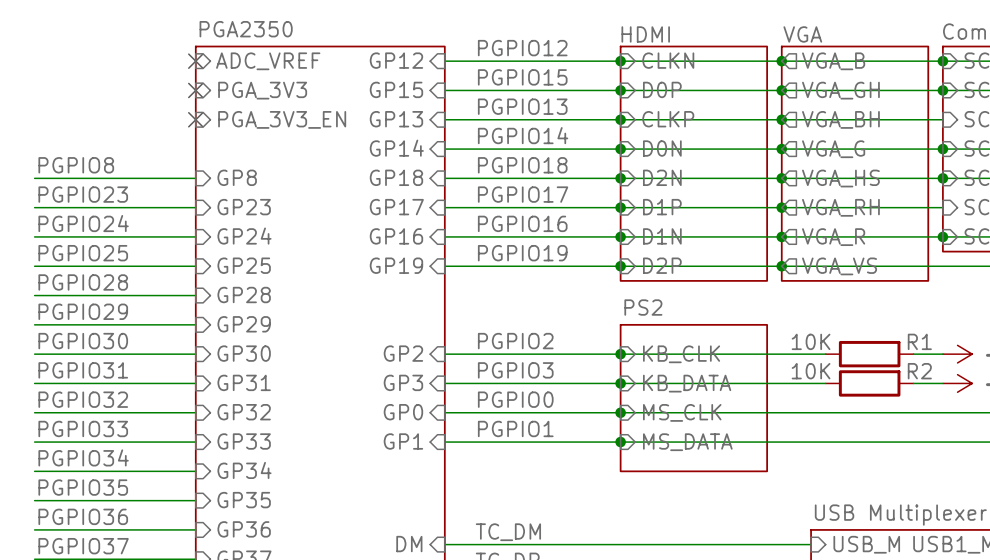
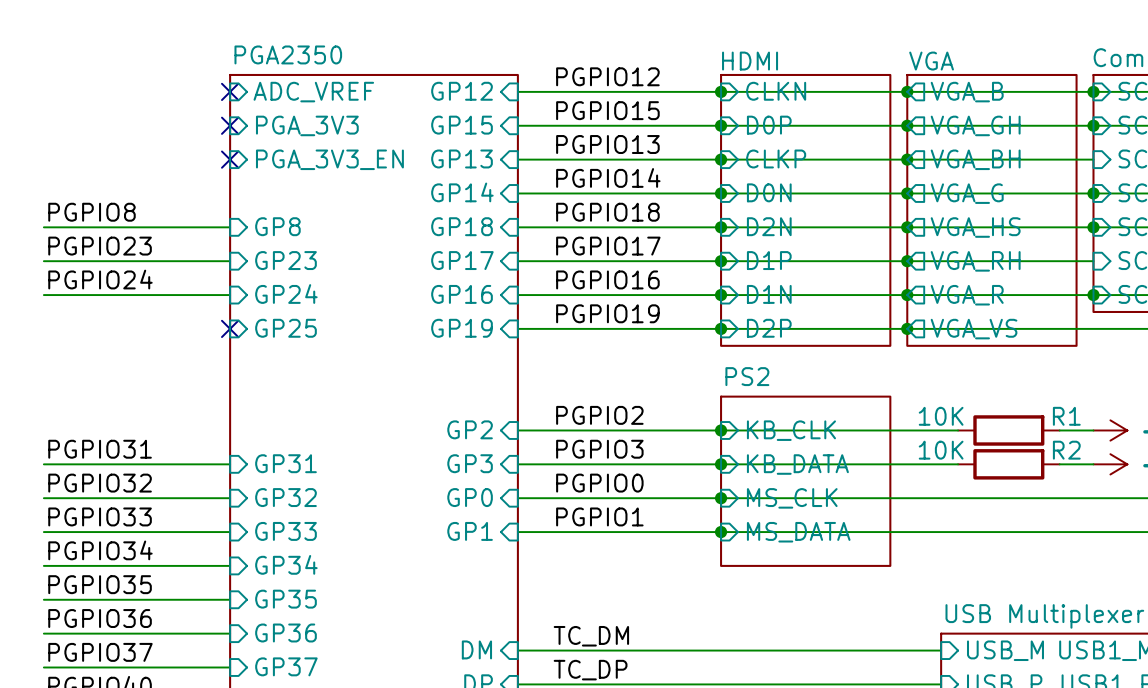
label: PGPIO25 (83, 253) -> none
wire: (34, 266) (195, 266) -> none
no-connect mark: none -> (230, 328)
label: PGPIO28 (83, 282) -> none
wire: (34, 295) (195, 295) -> none
sheet pin: GP28 (244, 295) -> none
label: PGPIO29 (83, 311) -> none
wire: (34, 324) (195, 324) -> none
sheet pin: GP29 (244, 324) -> none
label: PGPIO30 (83, 341) -> none
sheet pin: GP30 (244, 353) -> none
wire: (34, 354) (195, 354) -> none

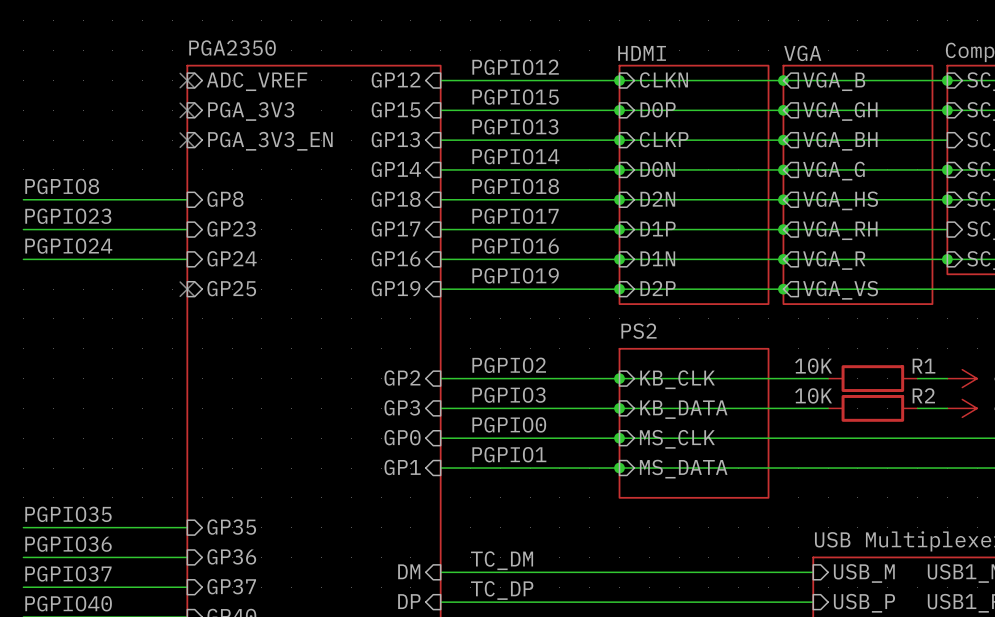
label: PGPIO31 (100, 449) -> none
sheet pin: GP31 (285, 463) -> none
wire: (43, 464) (230, 464) -> none
label: PGPIO32 (100, 483) -> none
sheet pin: GP32 (285, 497) -> none
wire: (43, 498) (230, 498) -> none
label: PGPIO33 (100, 516) -> none
sheet pin: GP33 (285, 531) -> none
wire: (43, 532) (230, 532) -> none
label: PGPIO34 (100, 550) -> none
sheet pin: GP34 (286, 564) -> none
wire: (43, 565) (230, 565) -> none

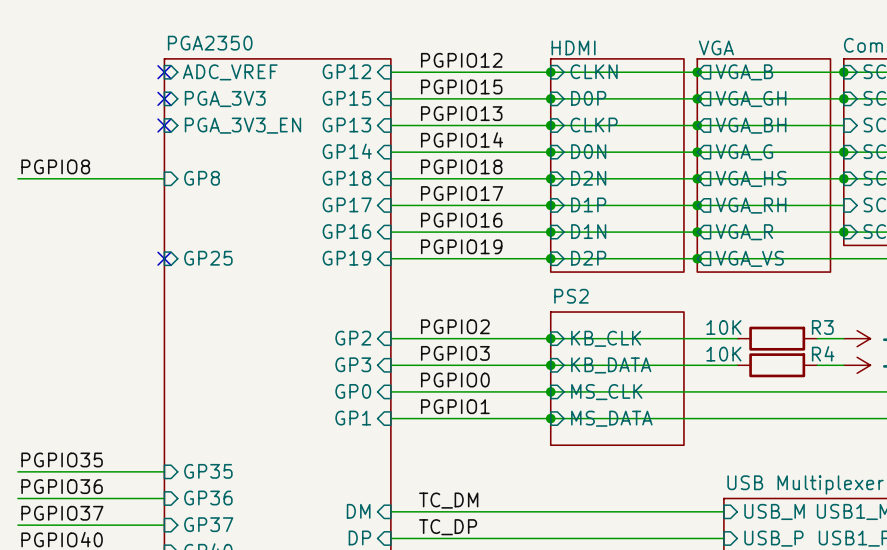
label: PGPIO23 (68, 216) -> none
wire: (23, 229) (187, 229) -> none
sheet pin: GP23 (231, 229) -> none
label: PGPIO24 (68, 246) -> none
sheet pin: GP24 (232, 258) -> none
wire: (23, 259) (187, 259) -> none
R1 name: R1 (923, 366) -> R3 (822, 327)
R2 name: R2 (923, 395) -> R4 (823, 353)

